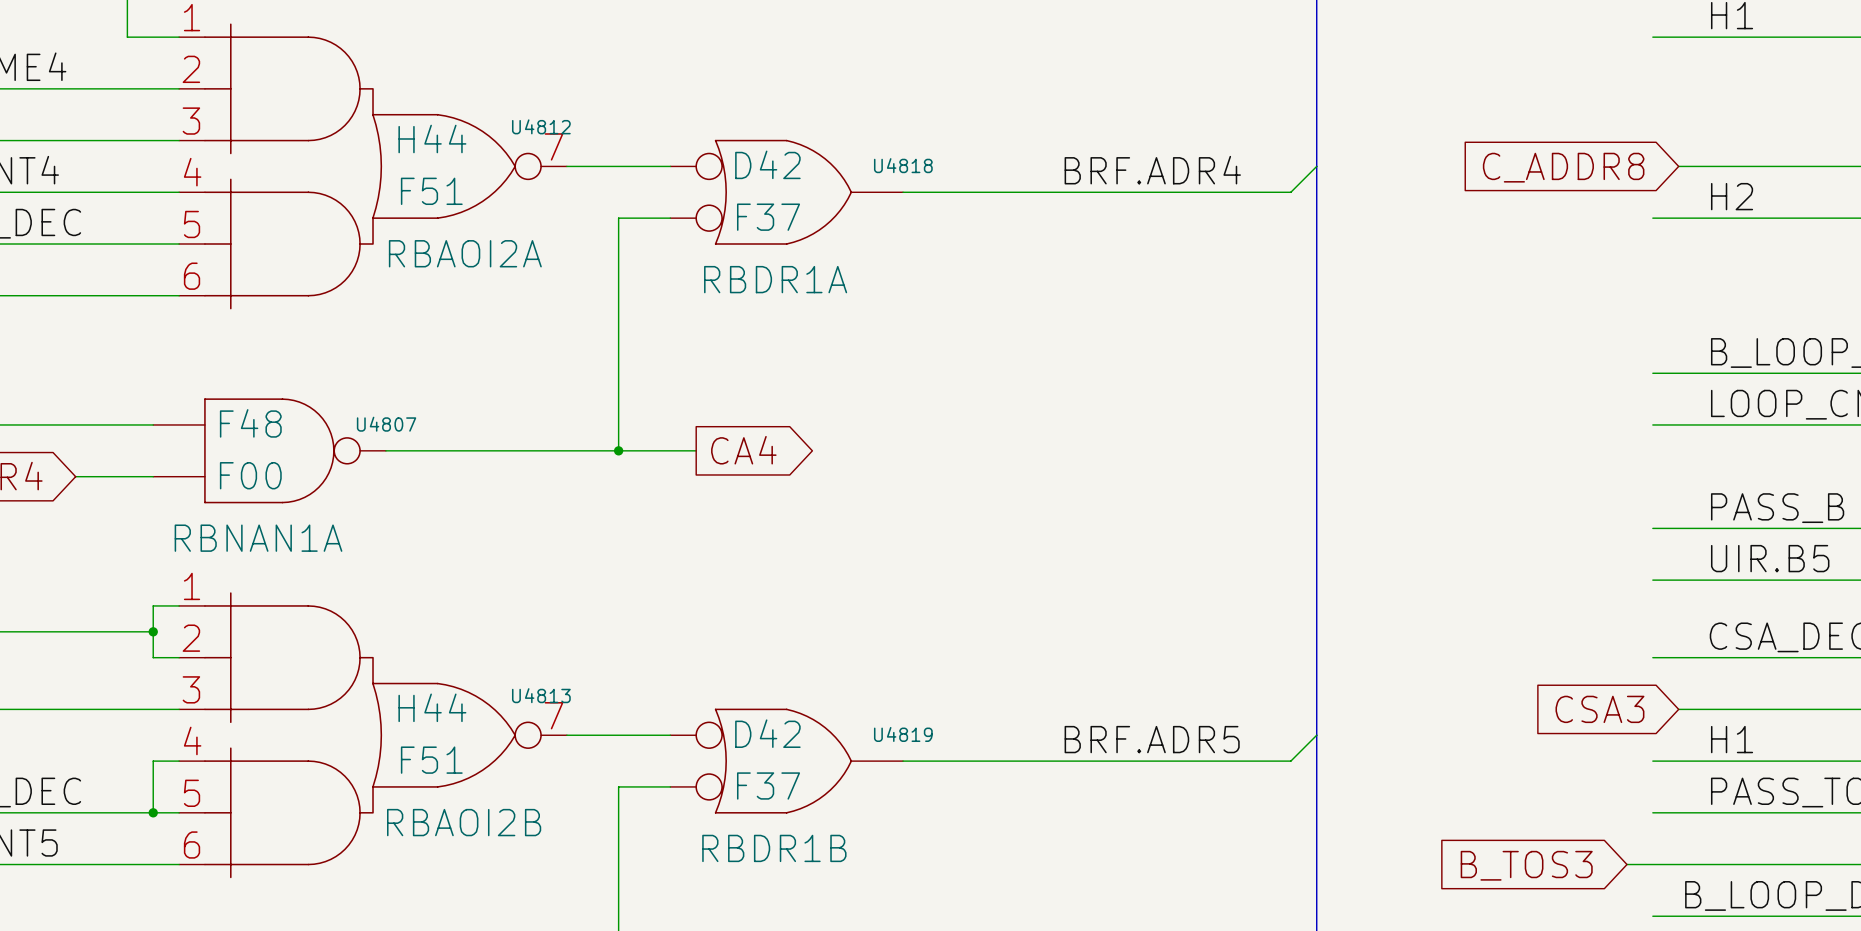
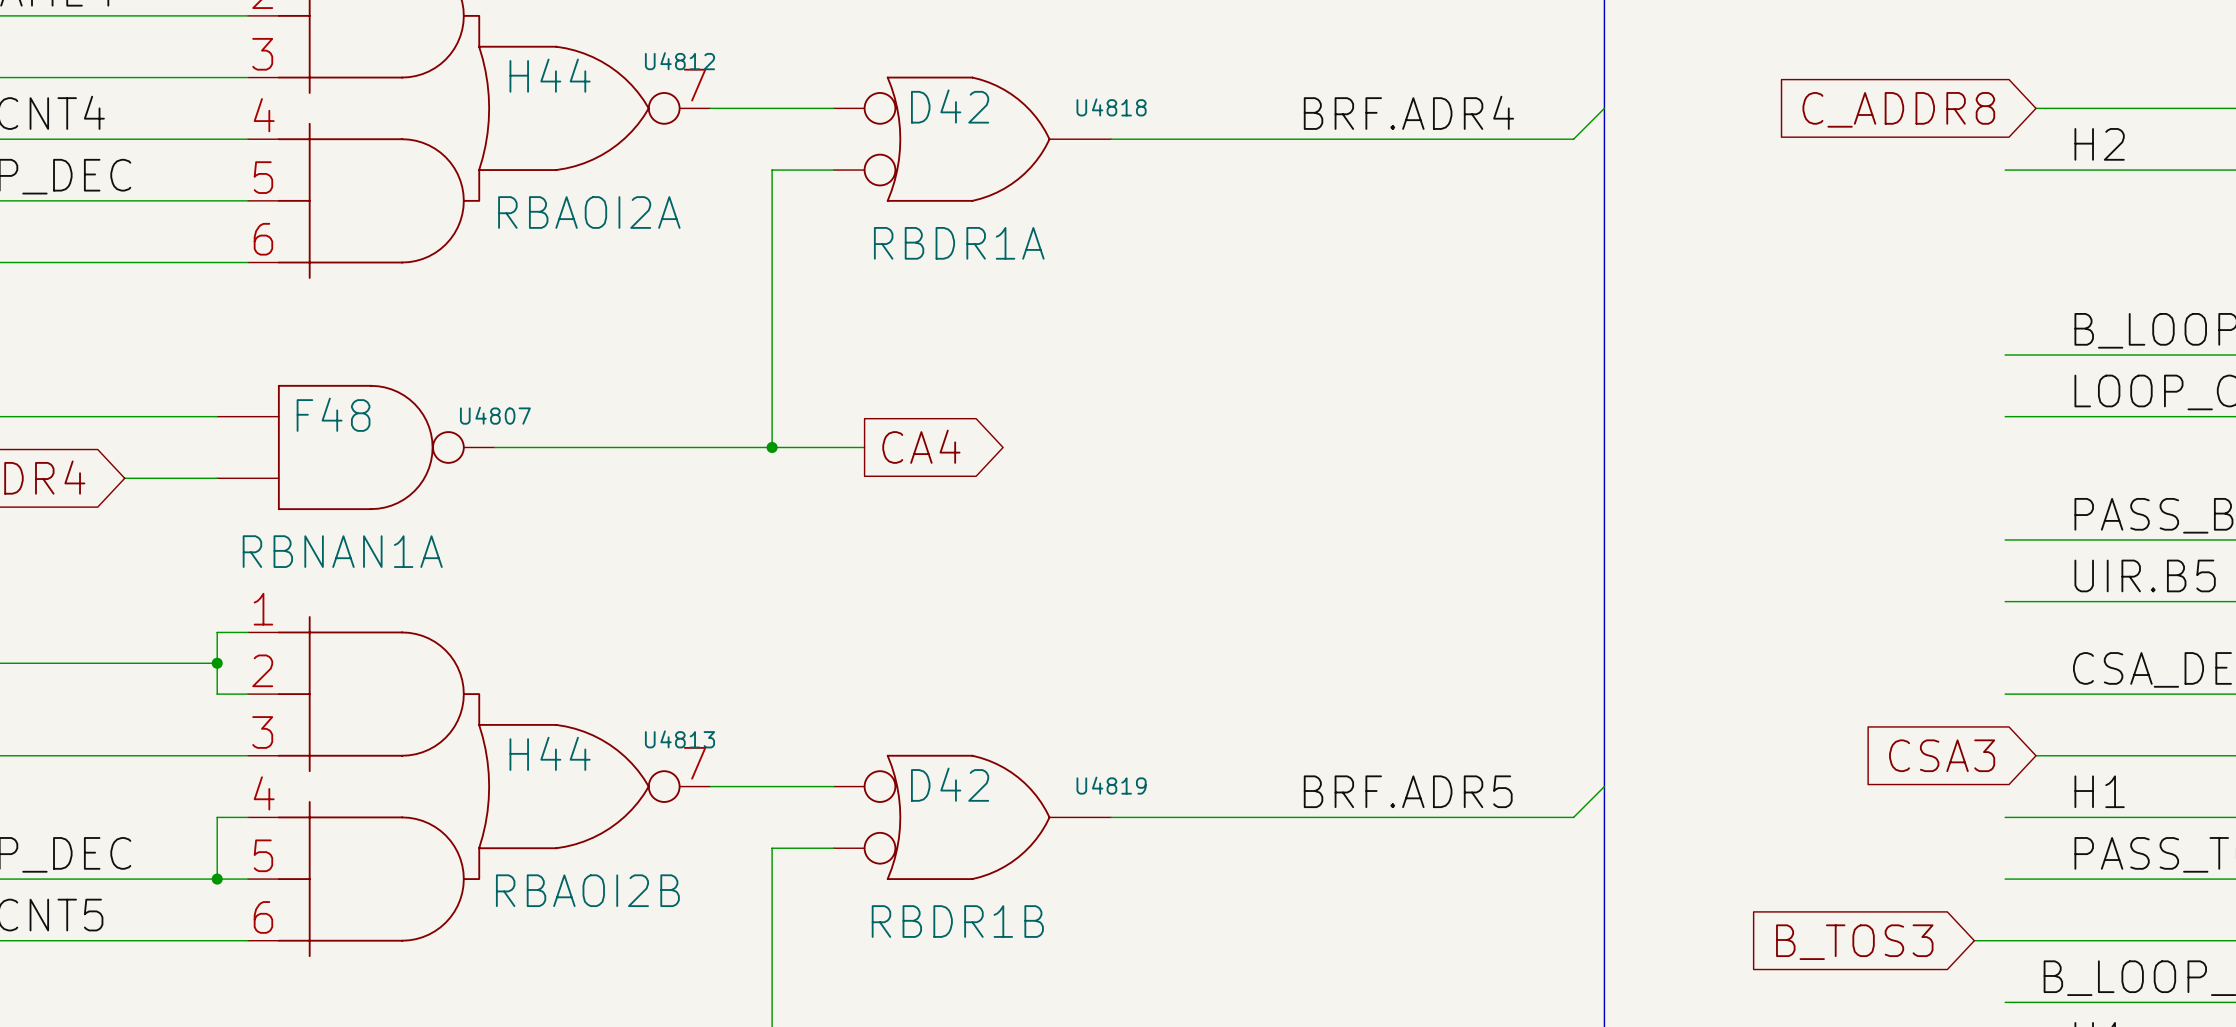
U4812 value: F51 (431, 191) -> none
U4818 value: F37 (768, 217) -> none
U4807 value: F00 (250, 475) -> none
U4813 value: F51 (431, 760) -> none
U4819 value: F37 (768, 785) -> none

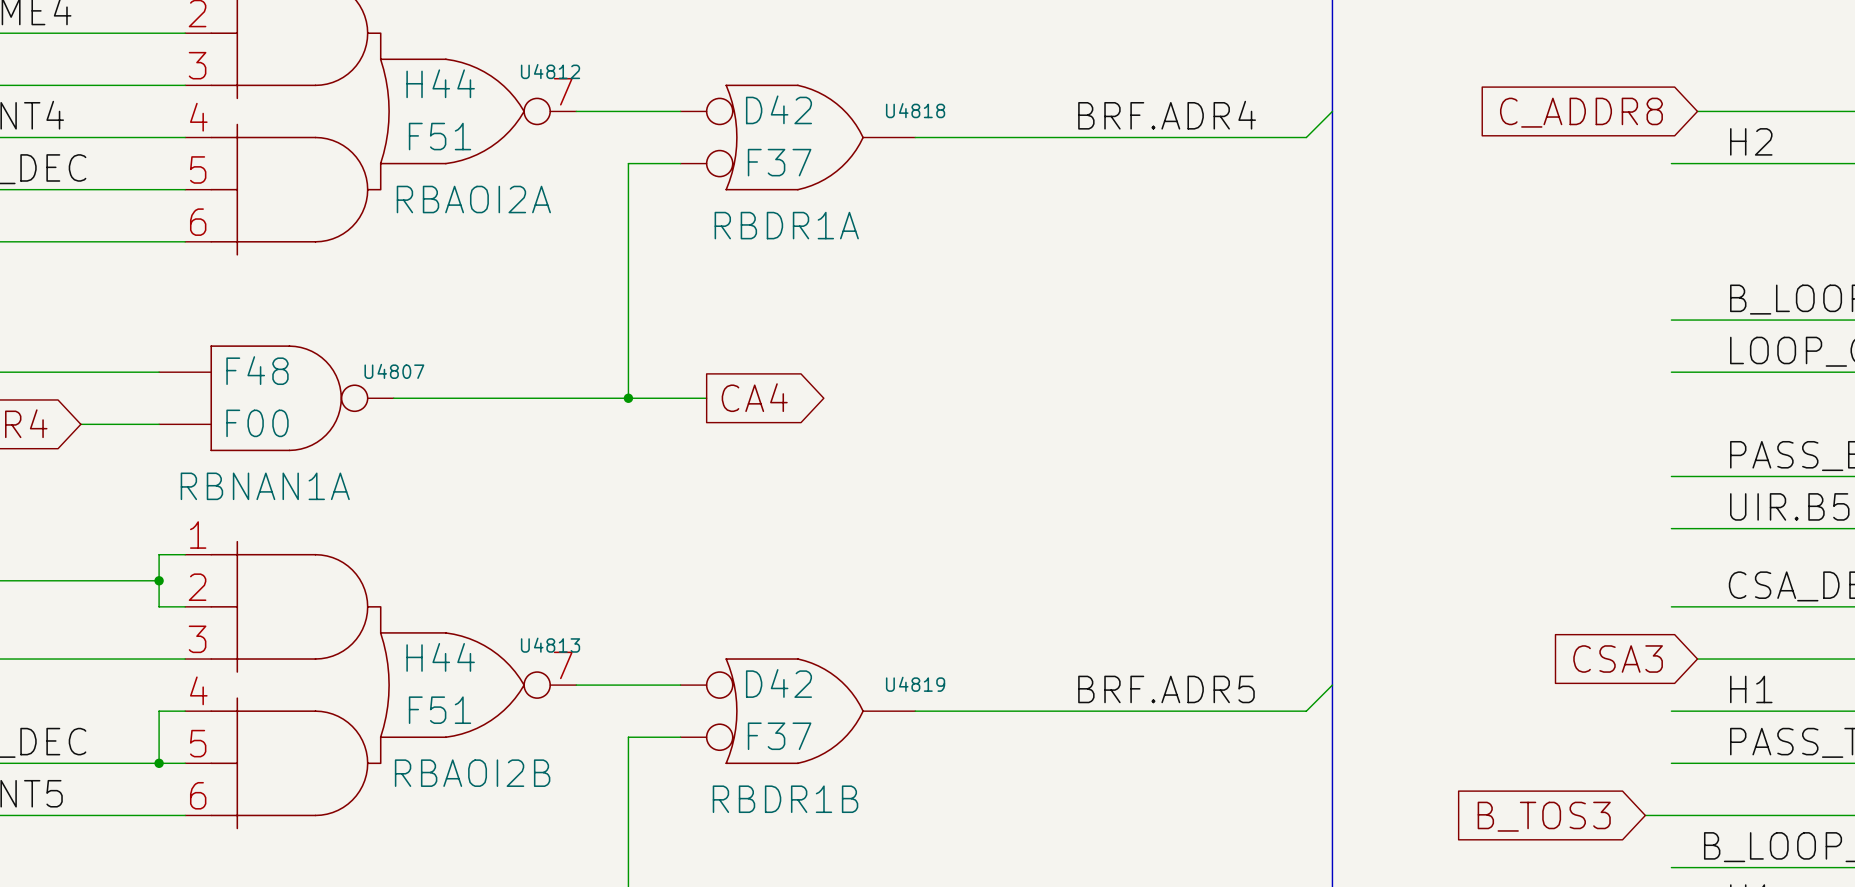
U4812 value: none -> F51 (440, 136)
U4818 value: none -> F37 (779, 162)
U4807 value: none -> F00 (257, 423)
U4813 value: none -> F51 (440, 710)
U4819 value: none -> F37 (779, 736)

